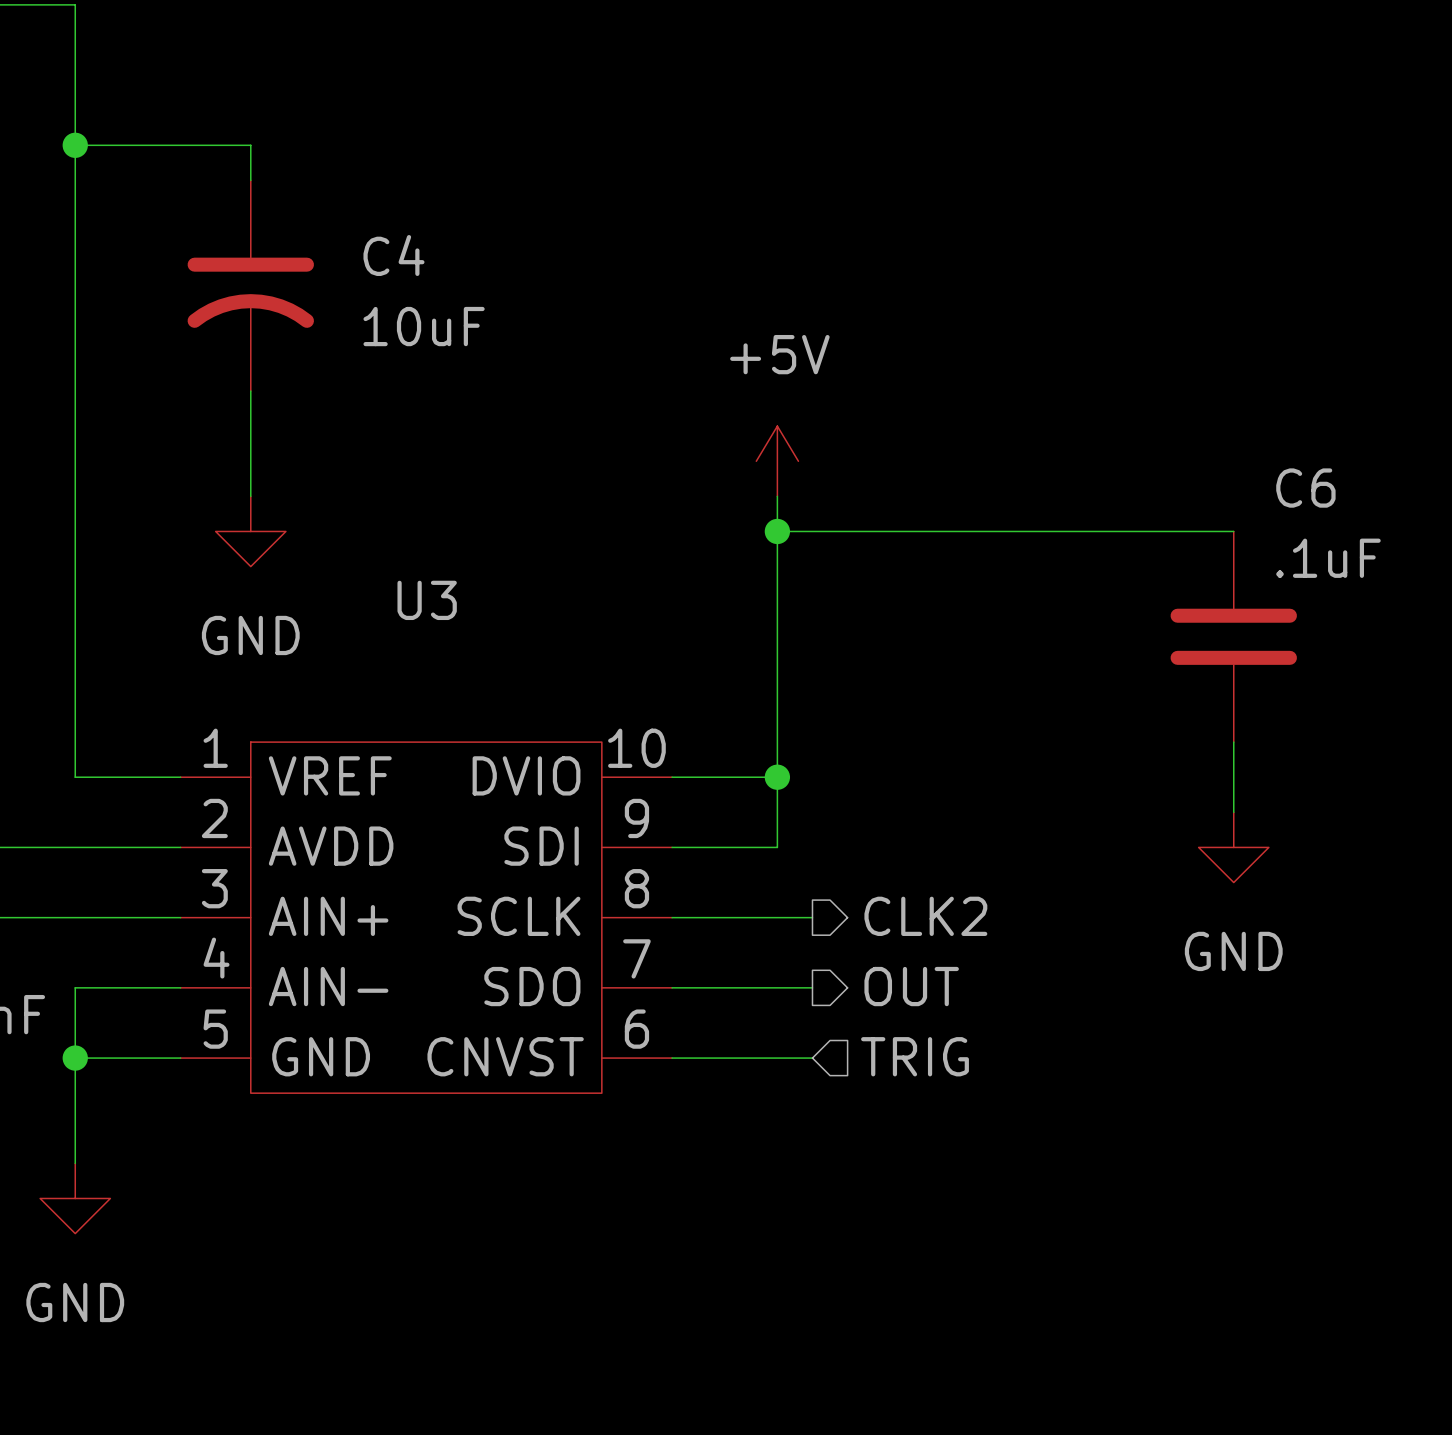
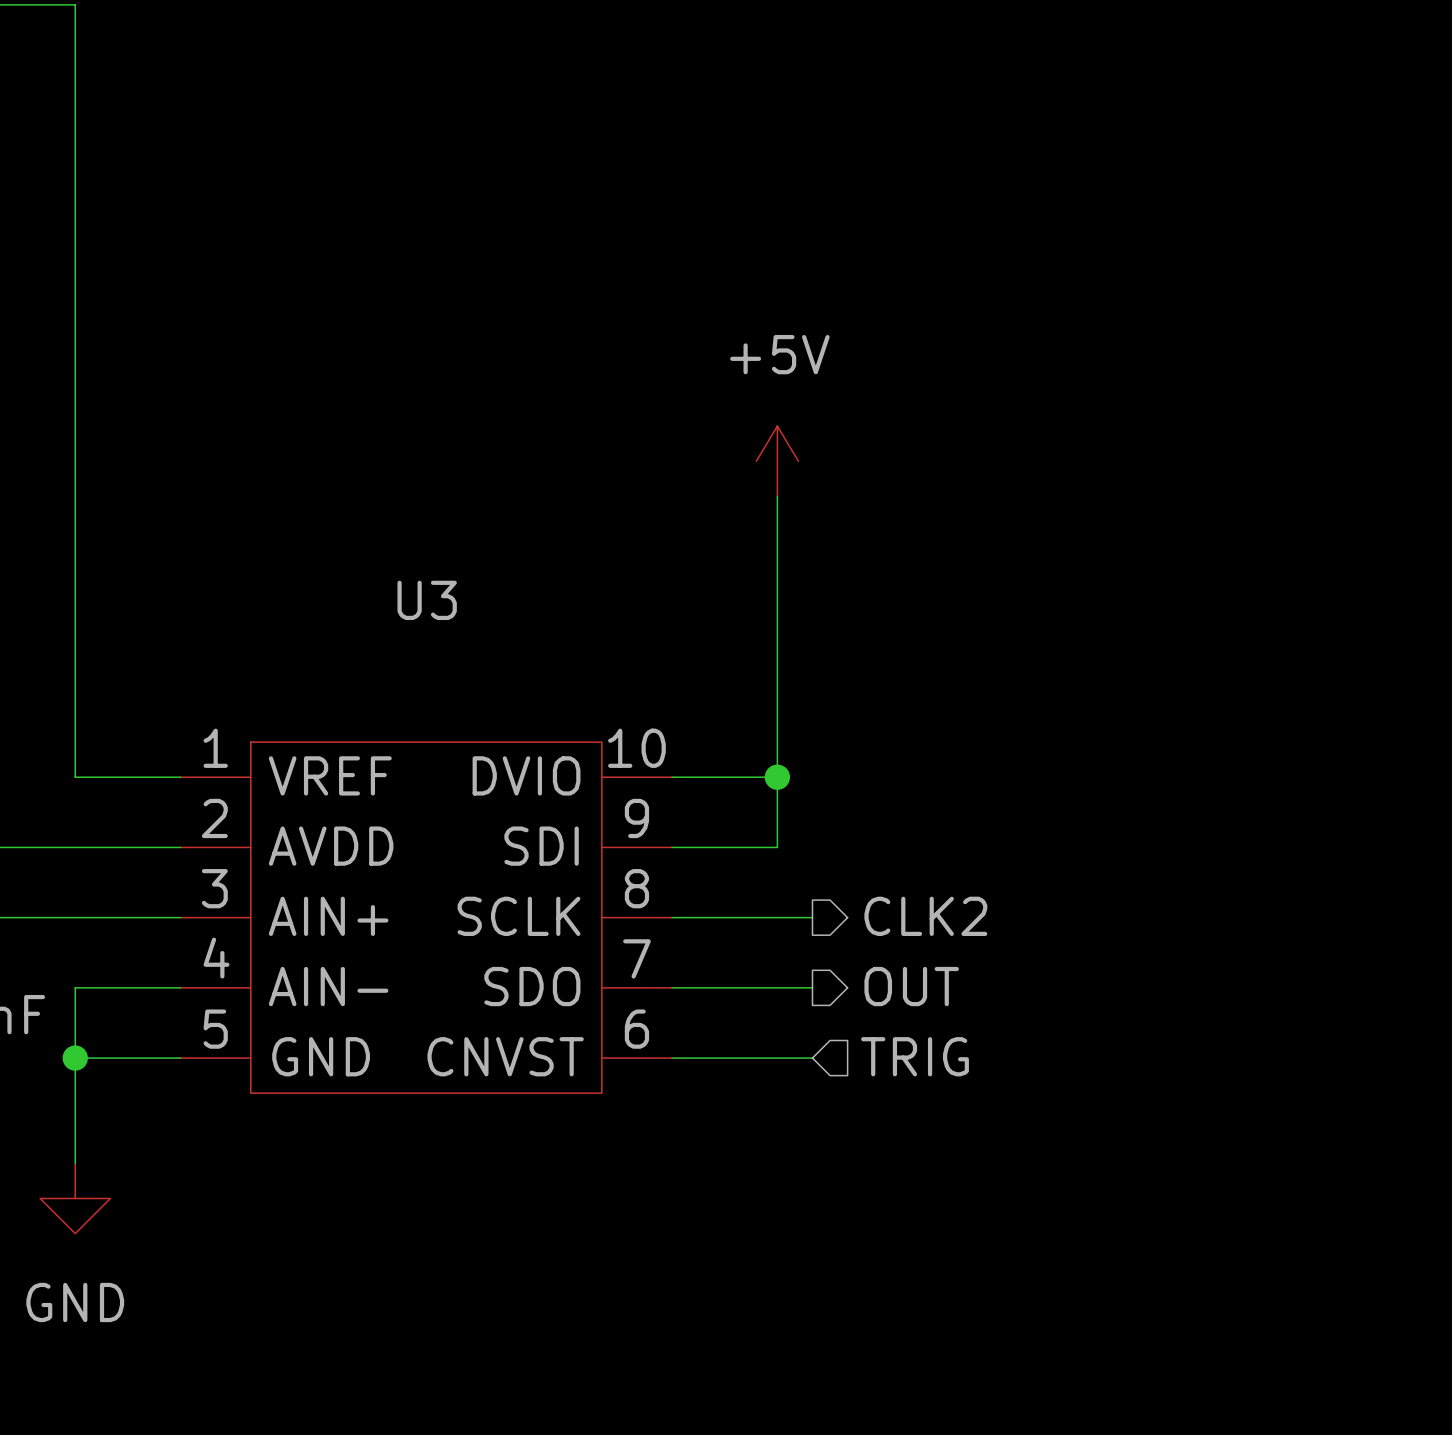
wire: (75, 145) (250, 145) (250, 180) -> none
junction: (75, 145) -> none
C4: 10uF (250, 285) -> none
wire: (250, 391) (250, 496) -> none
power symbol: GND (250, 531) -> none
wire: (777, 531) (1233, 531) -> none
junction: (777, 531) -> none
C6: .1uF (1233, 636) -> none
wire: (1233, 742) (1233, 812) -> none
power symbol: GND (1233, 847) -> none

